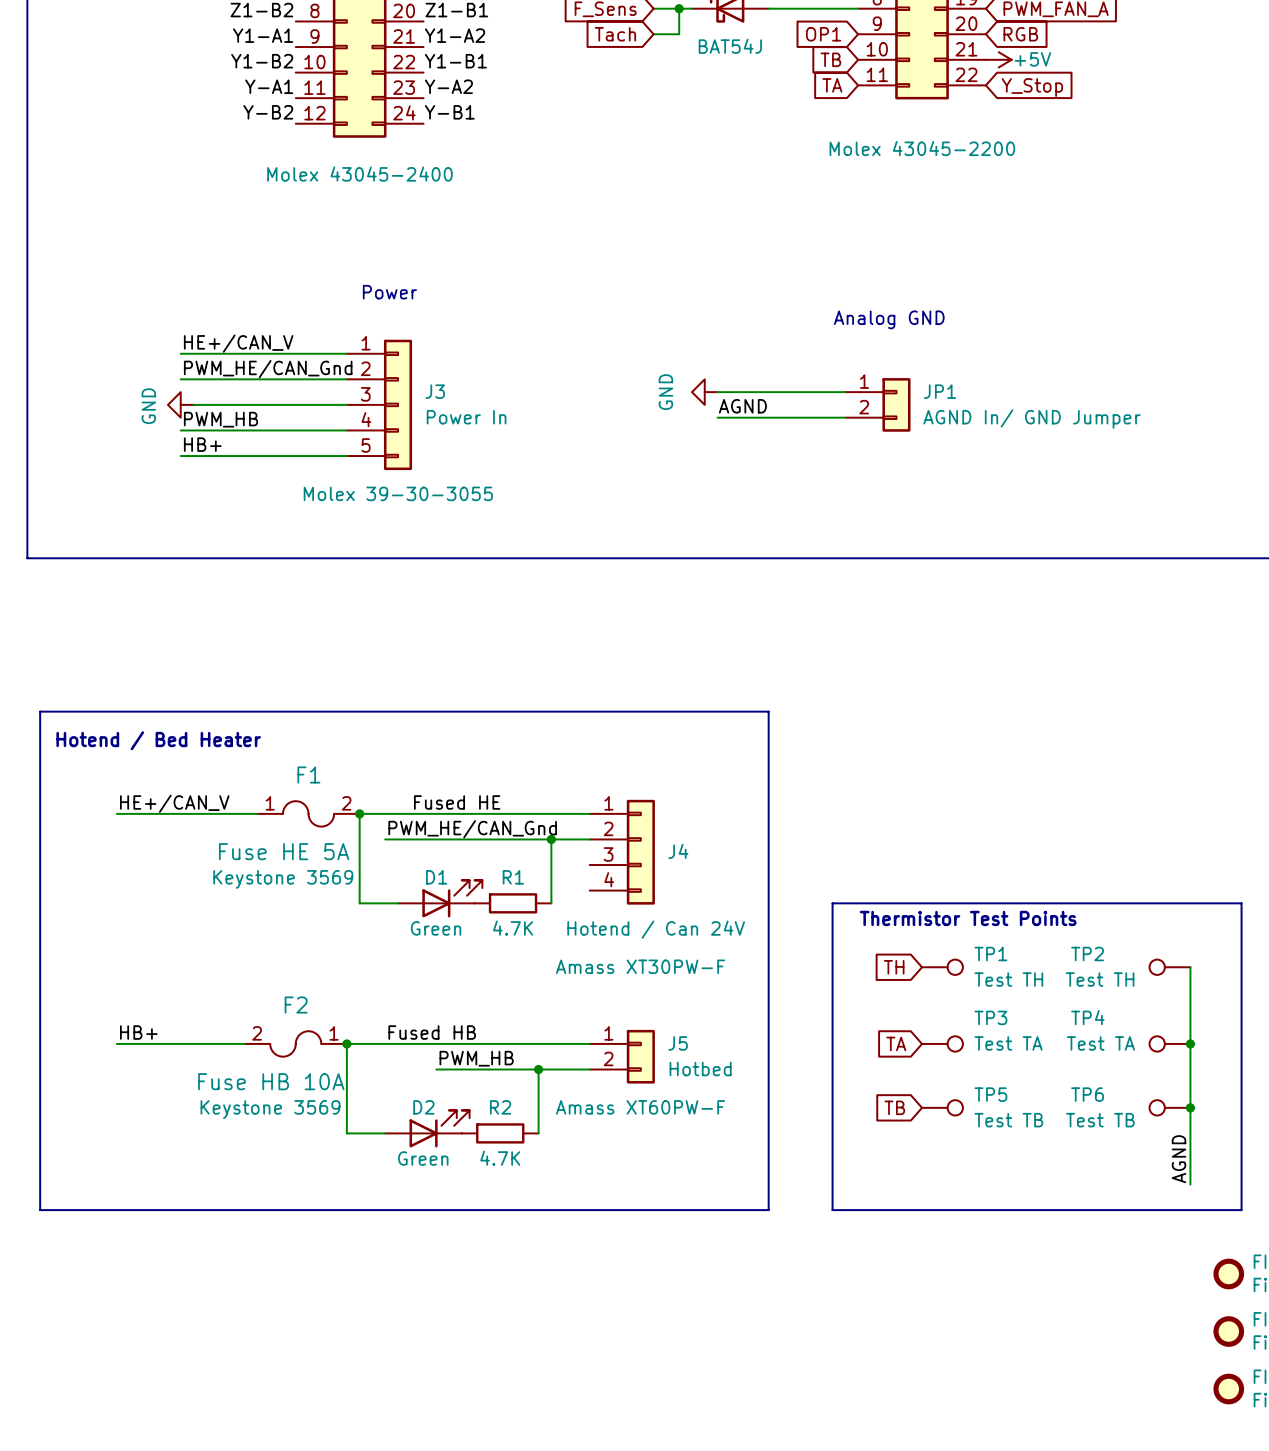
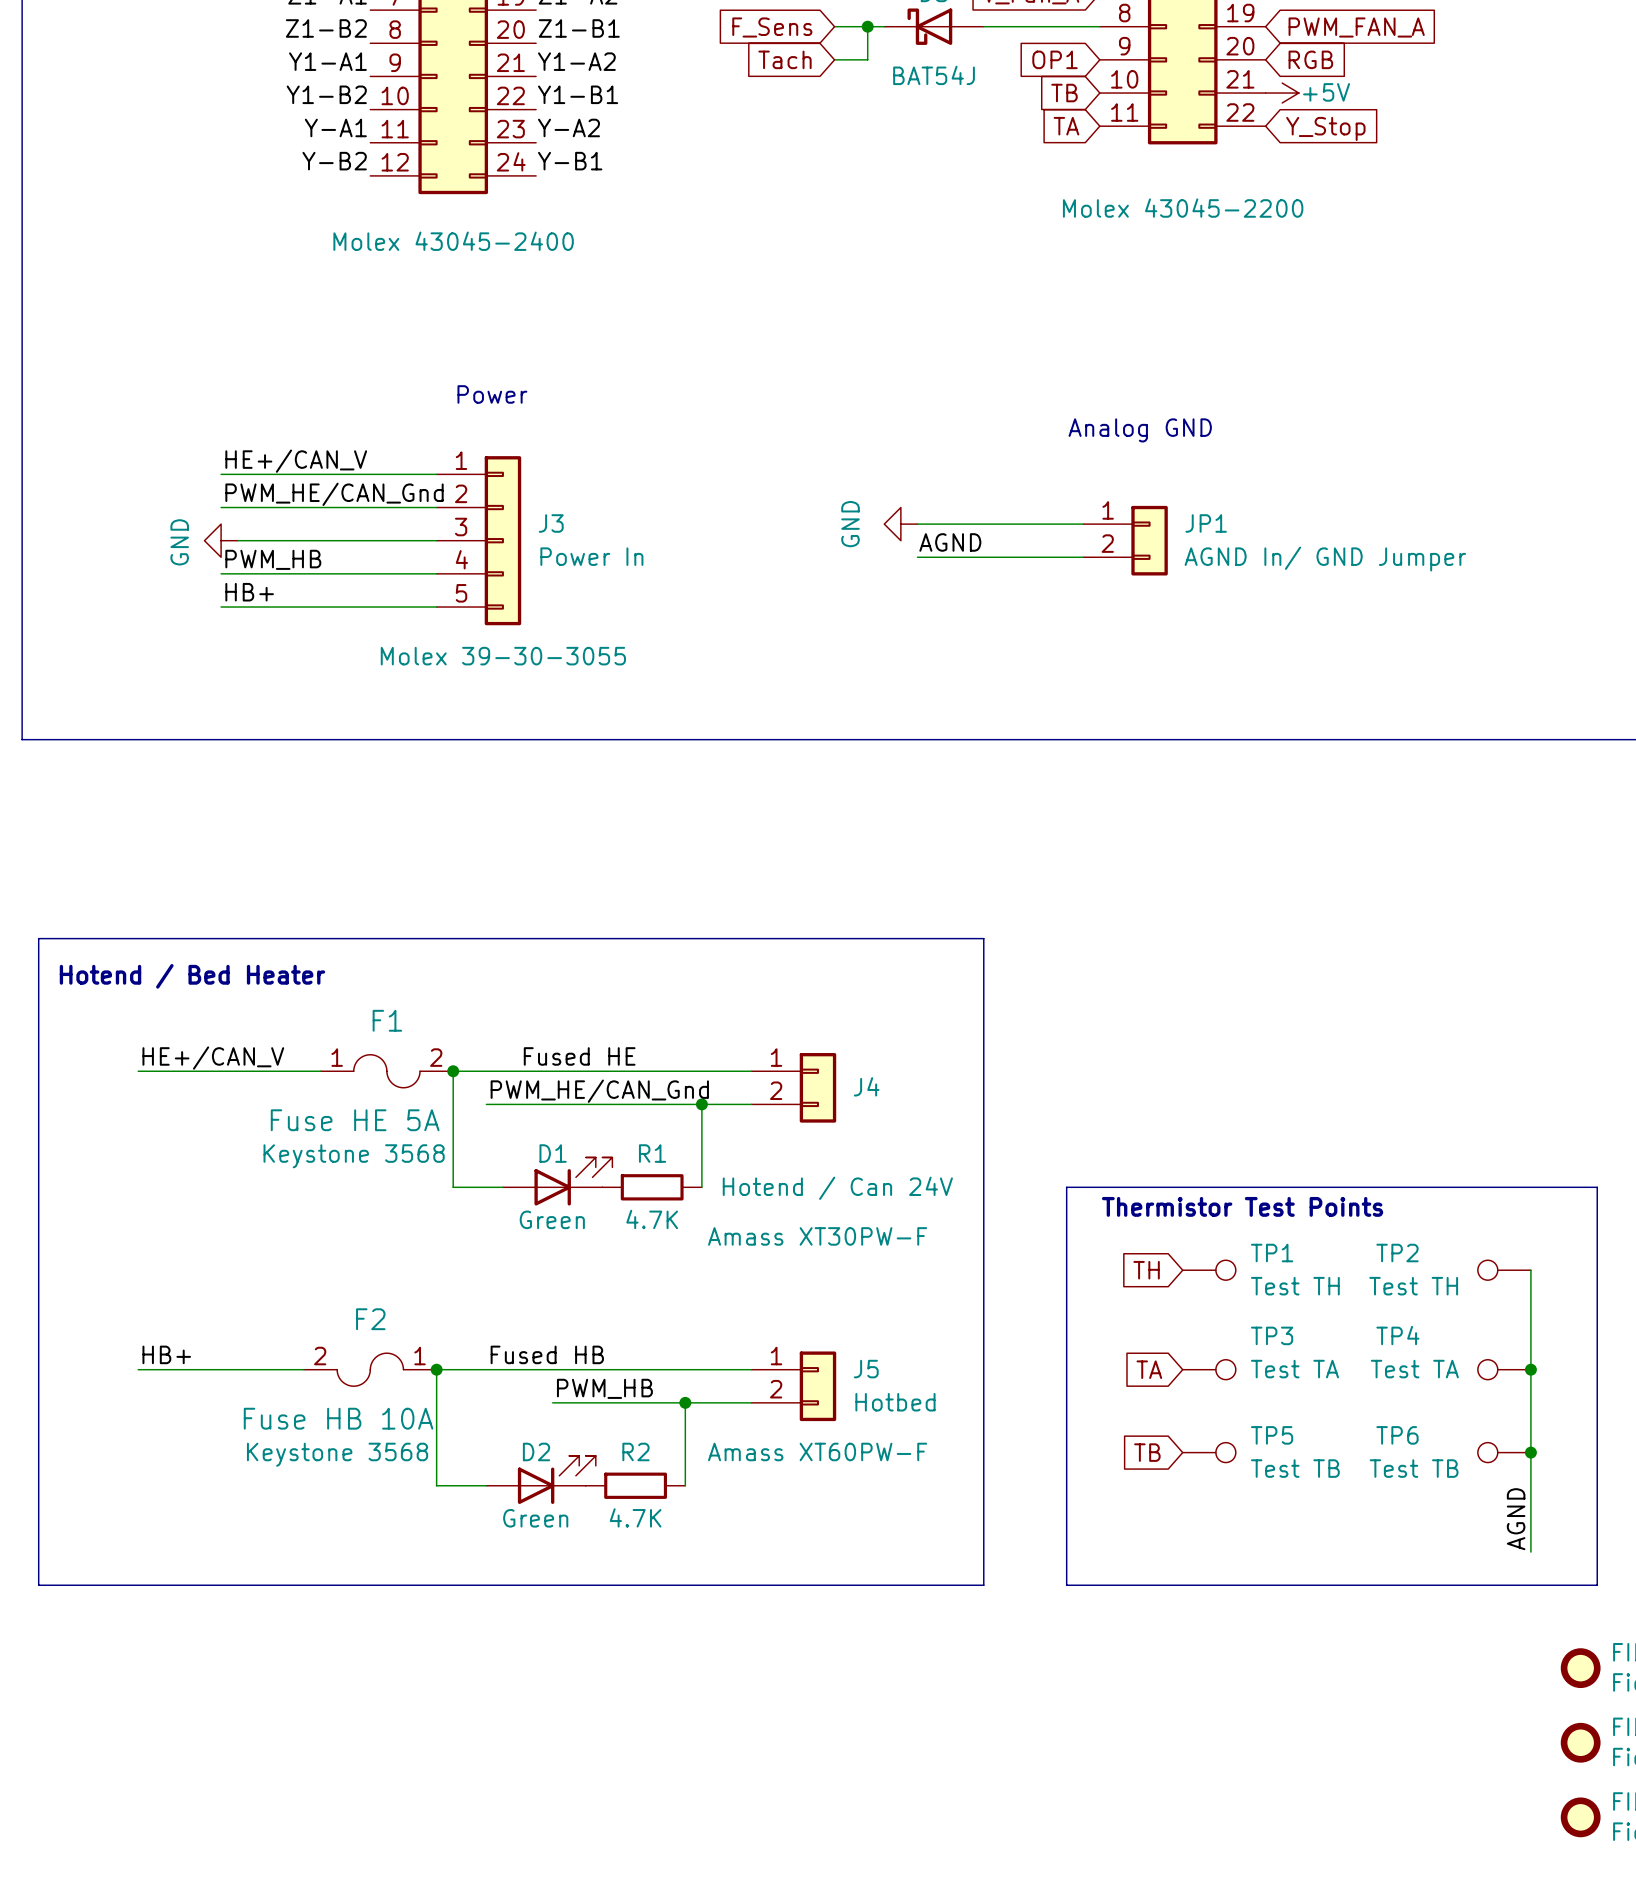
J4 symbol: [589, 799, 655, 905] -> [751, 1053, 837, 1123]
F1 text: Keystone 3569 (283, 879) -> Keystone 3568 (354, 1156)
F2 text: Keystone 3569 (270, 1109) -> Keystone 3568 (337, 1454)

